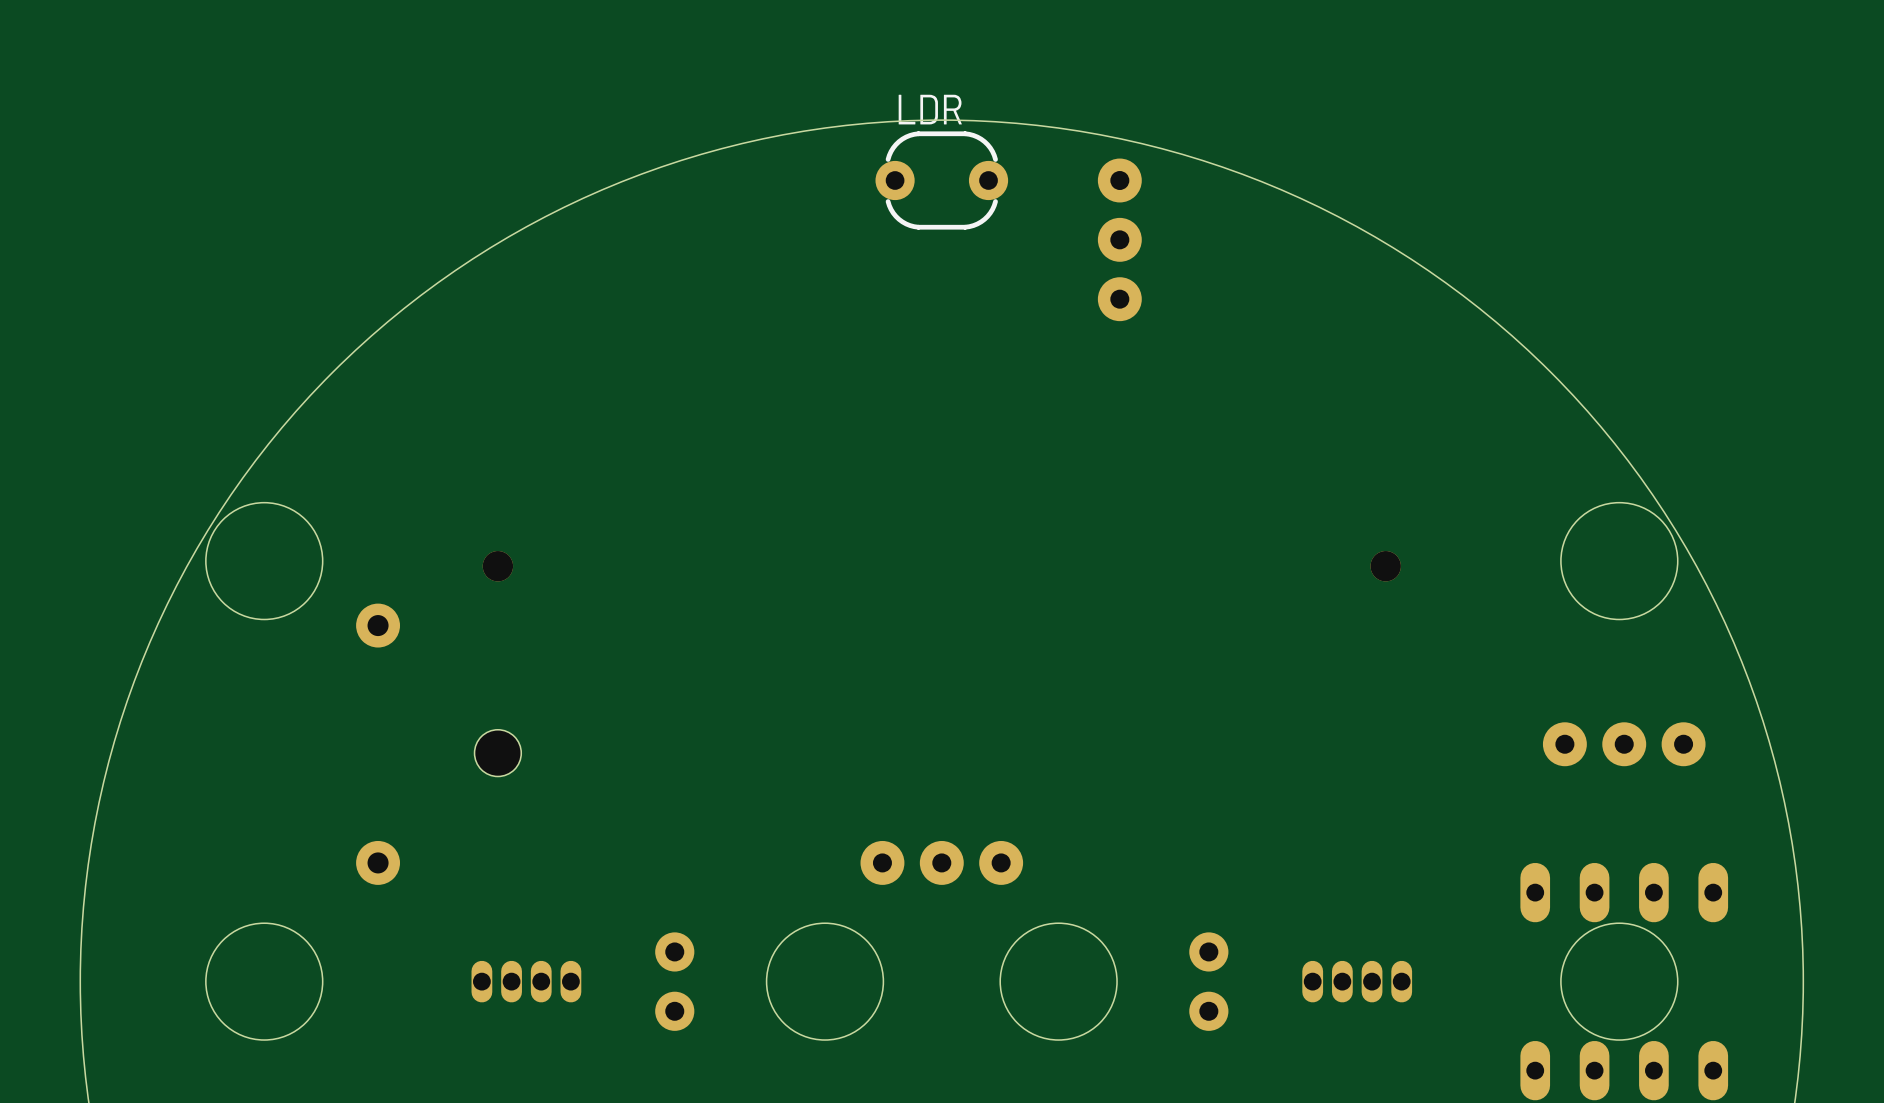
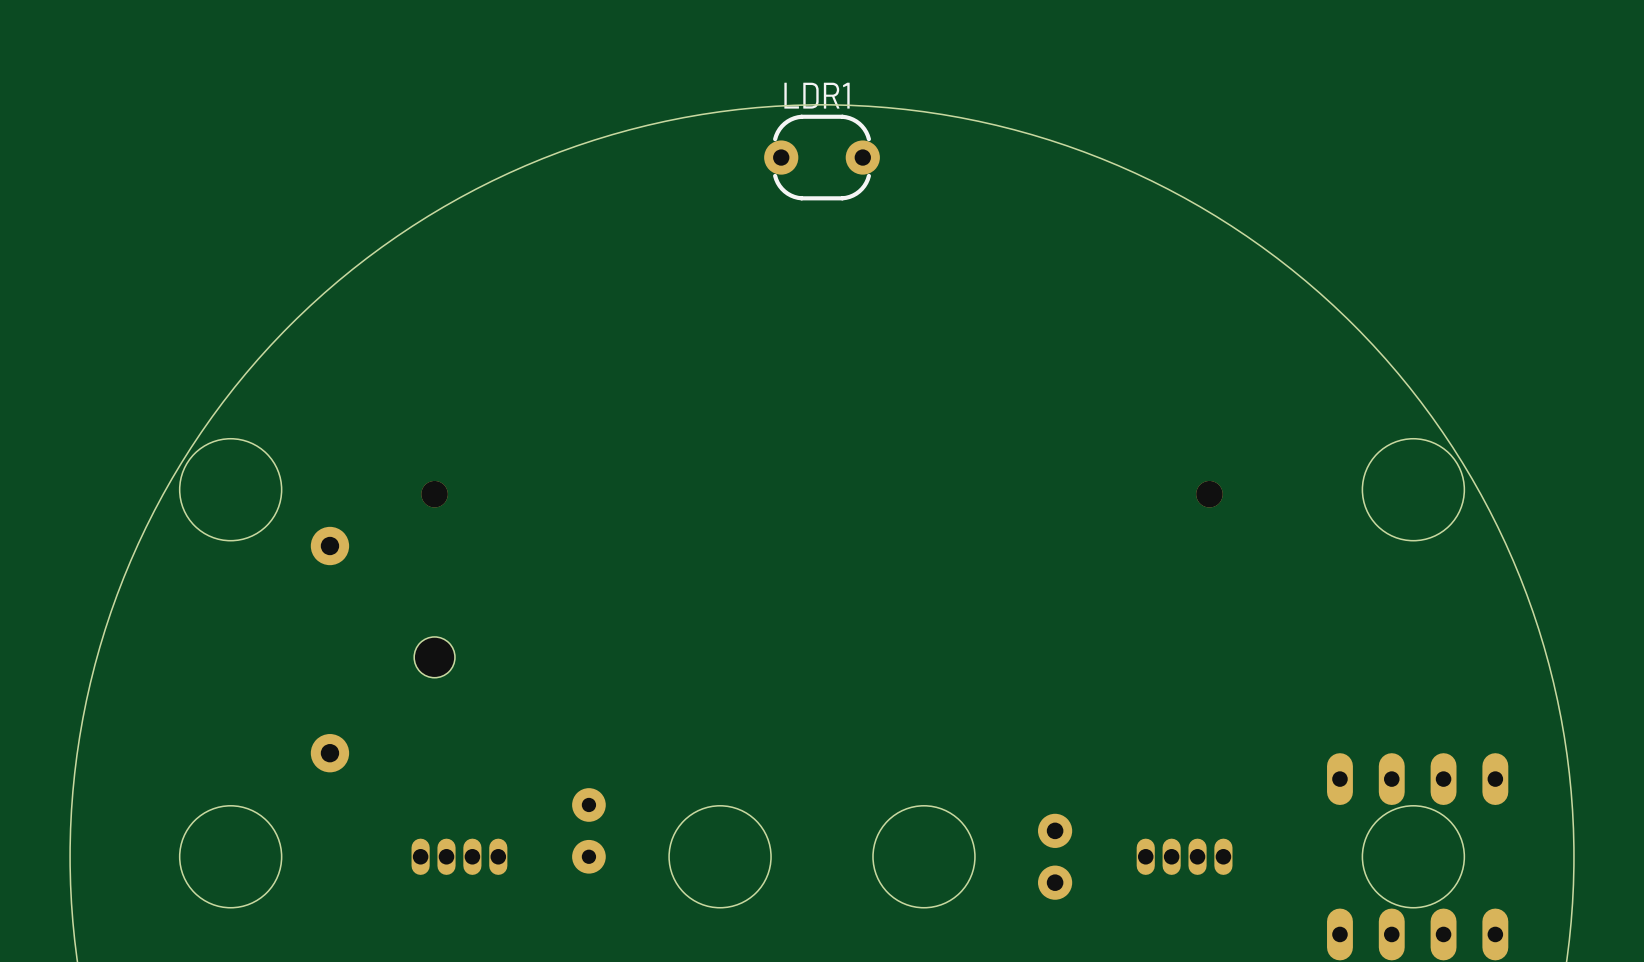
LDR name: LDR (930, 109) -> LDR1 (817, 95)
part: (1119, 239) -> none
part: (1624, 744) -> none
part: (941, 862) -> none
part: none -> (588, 830)
part: (674, 981) -> none

